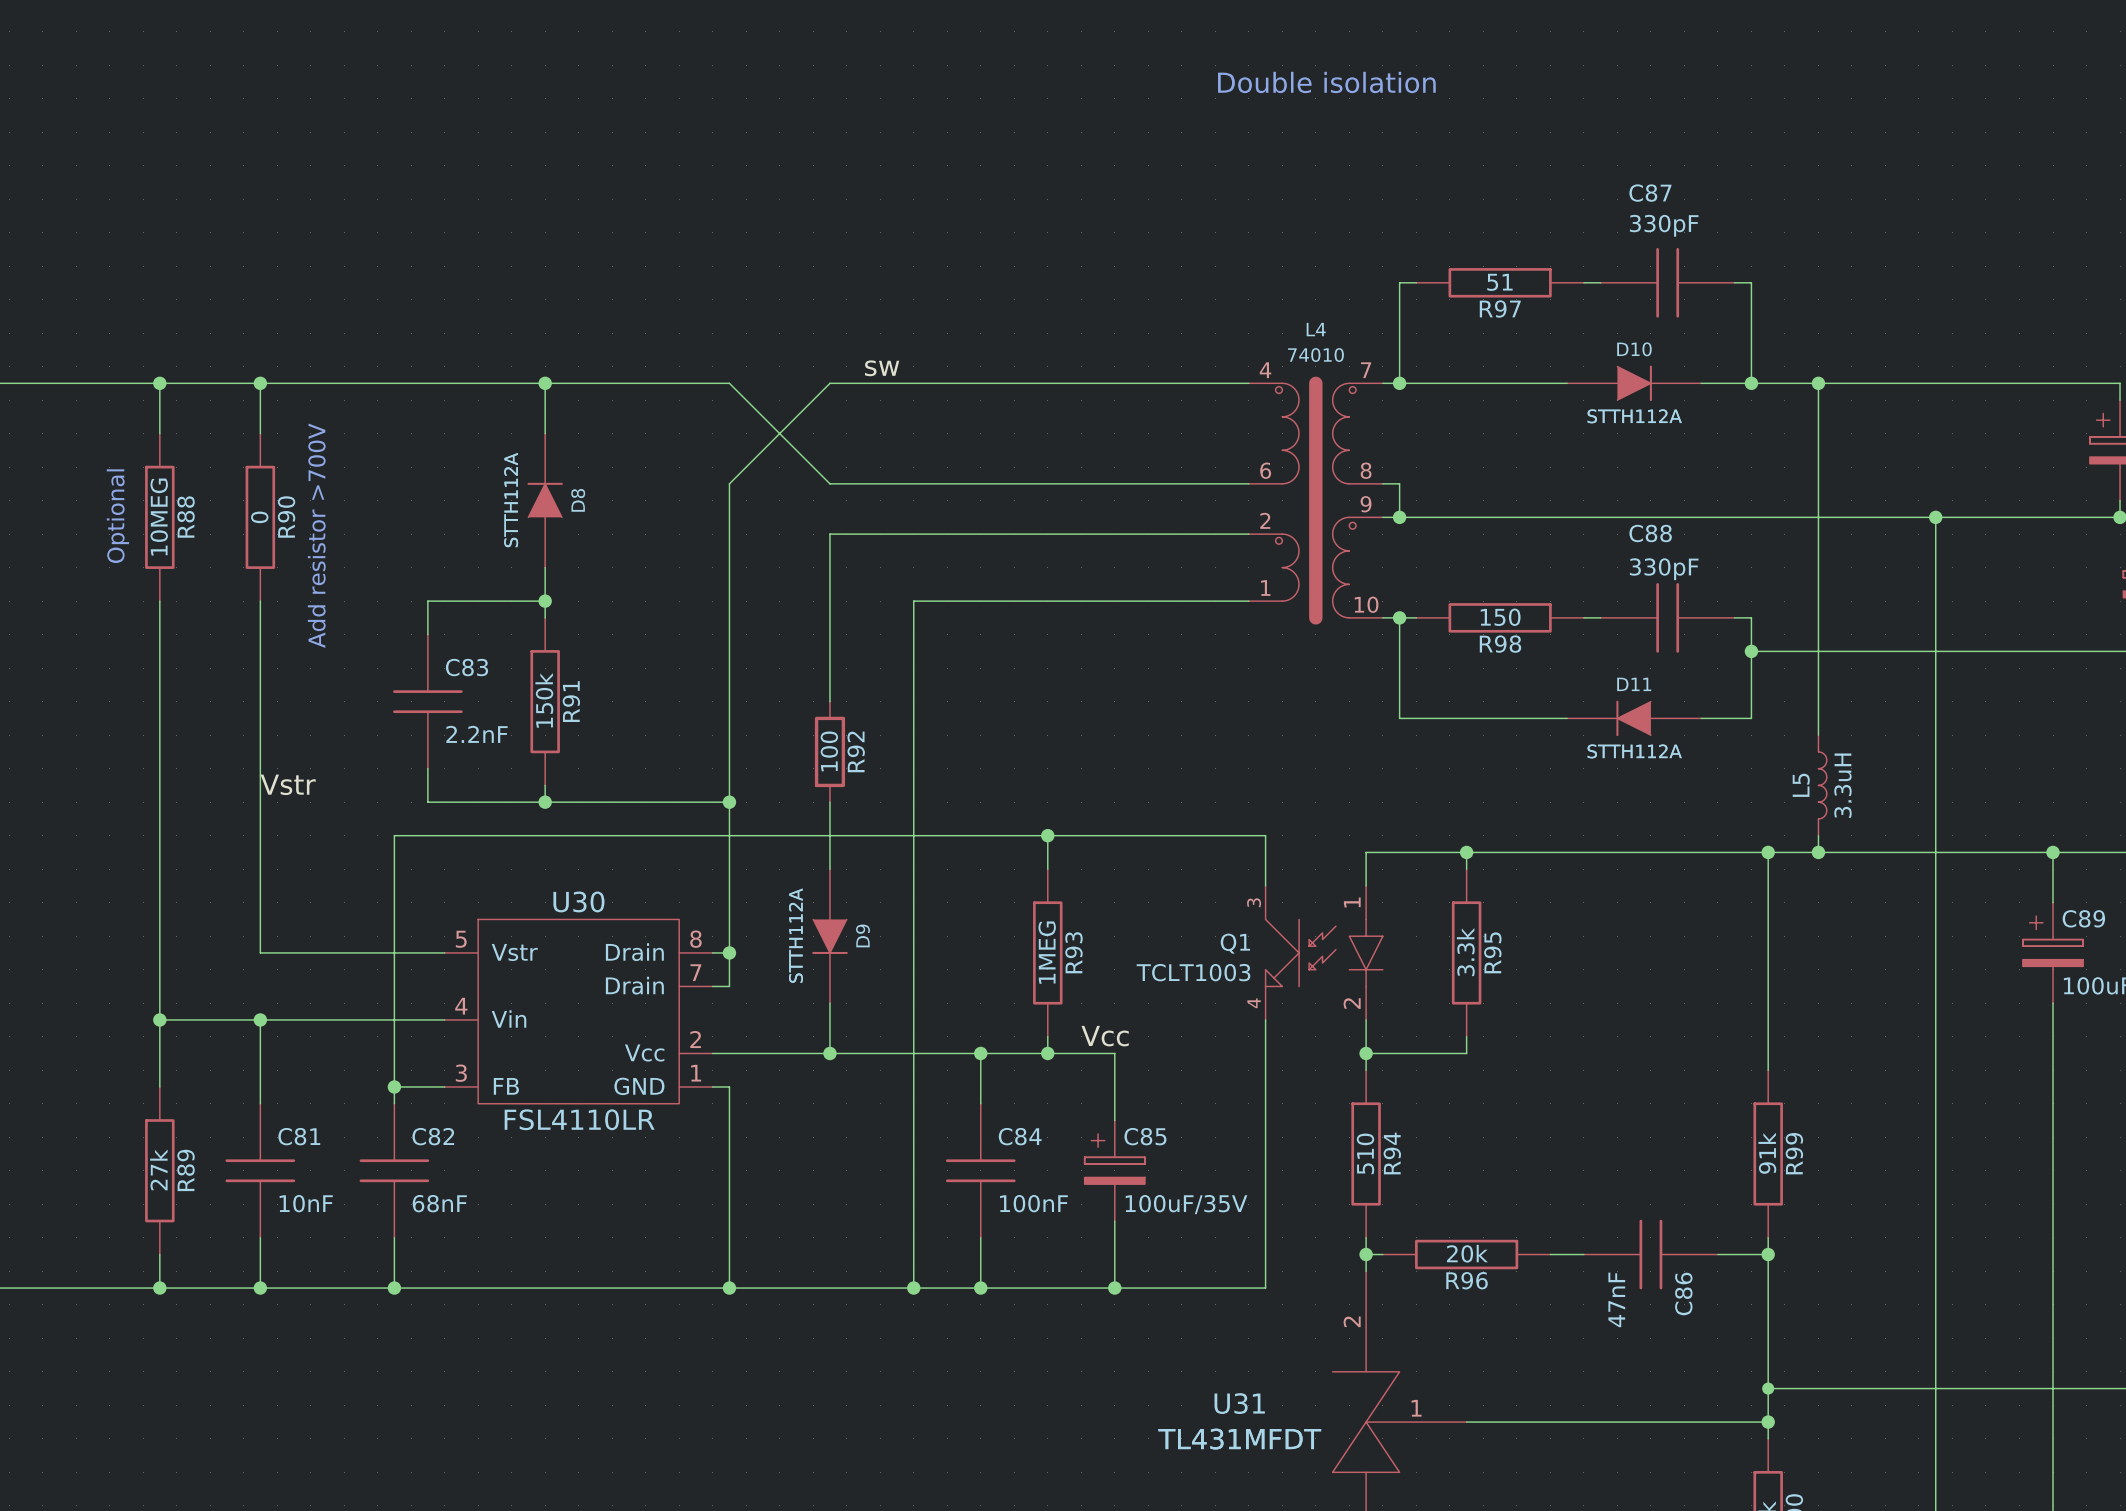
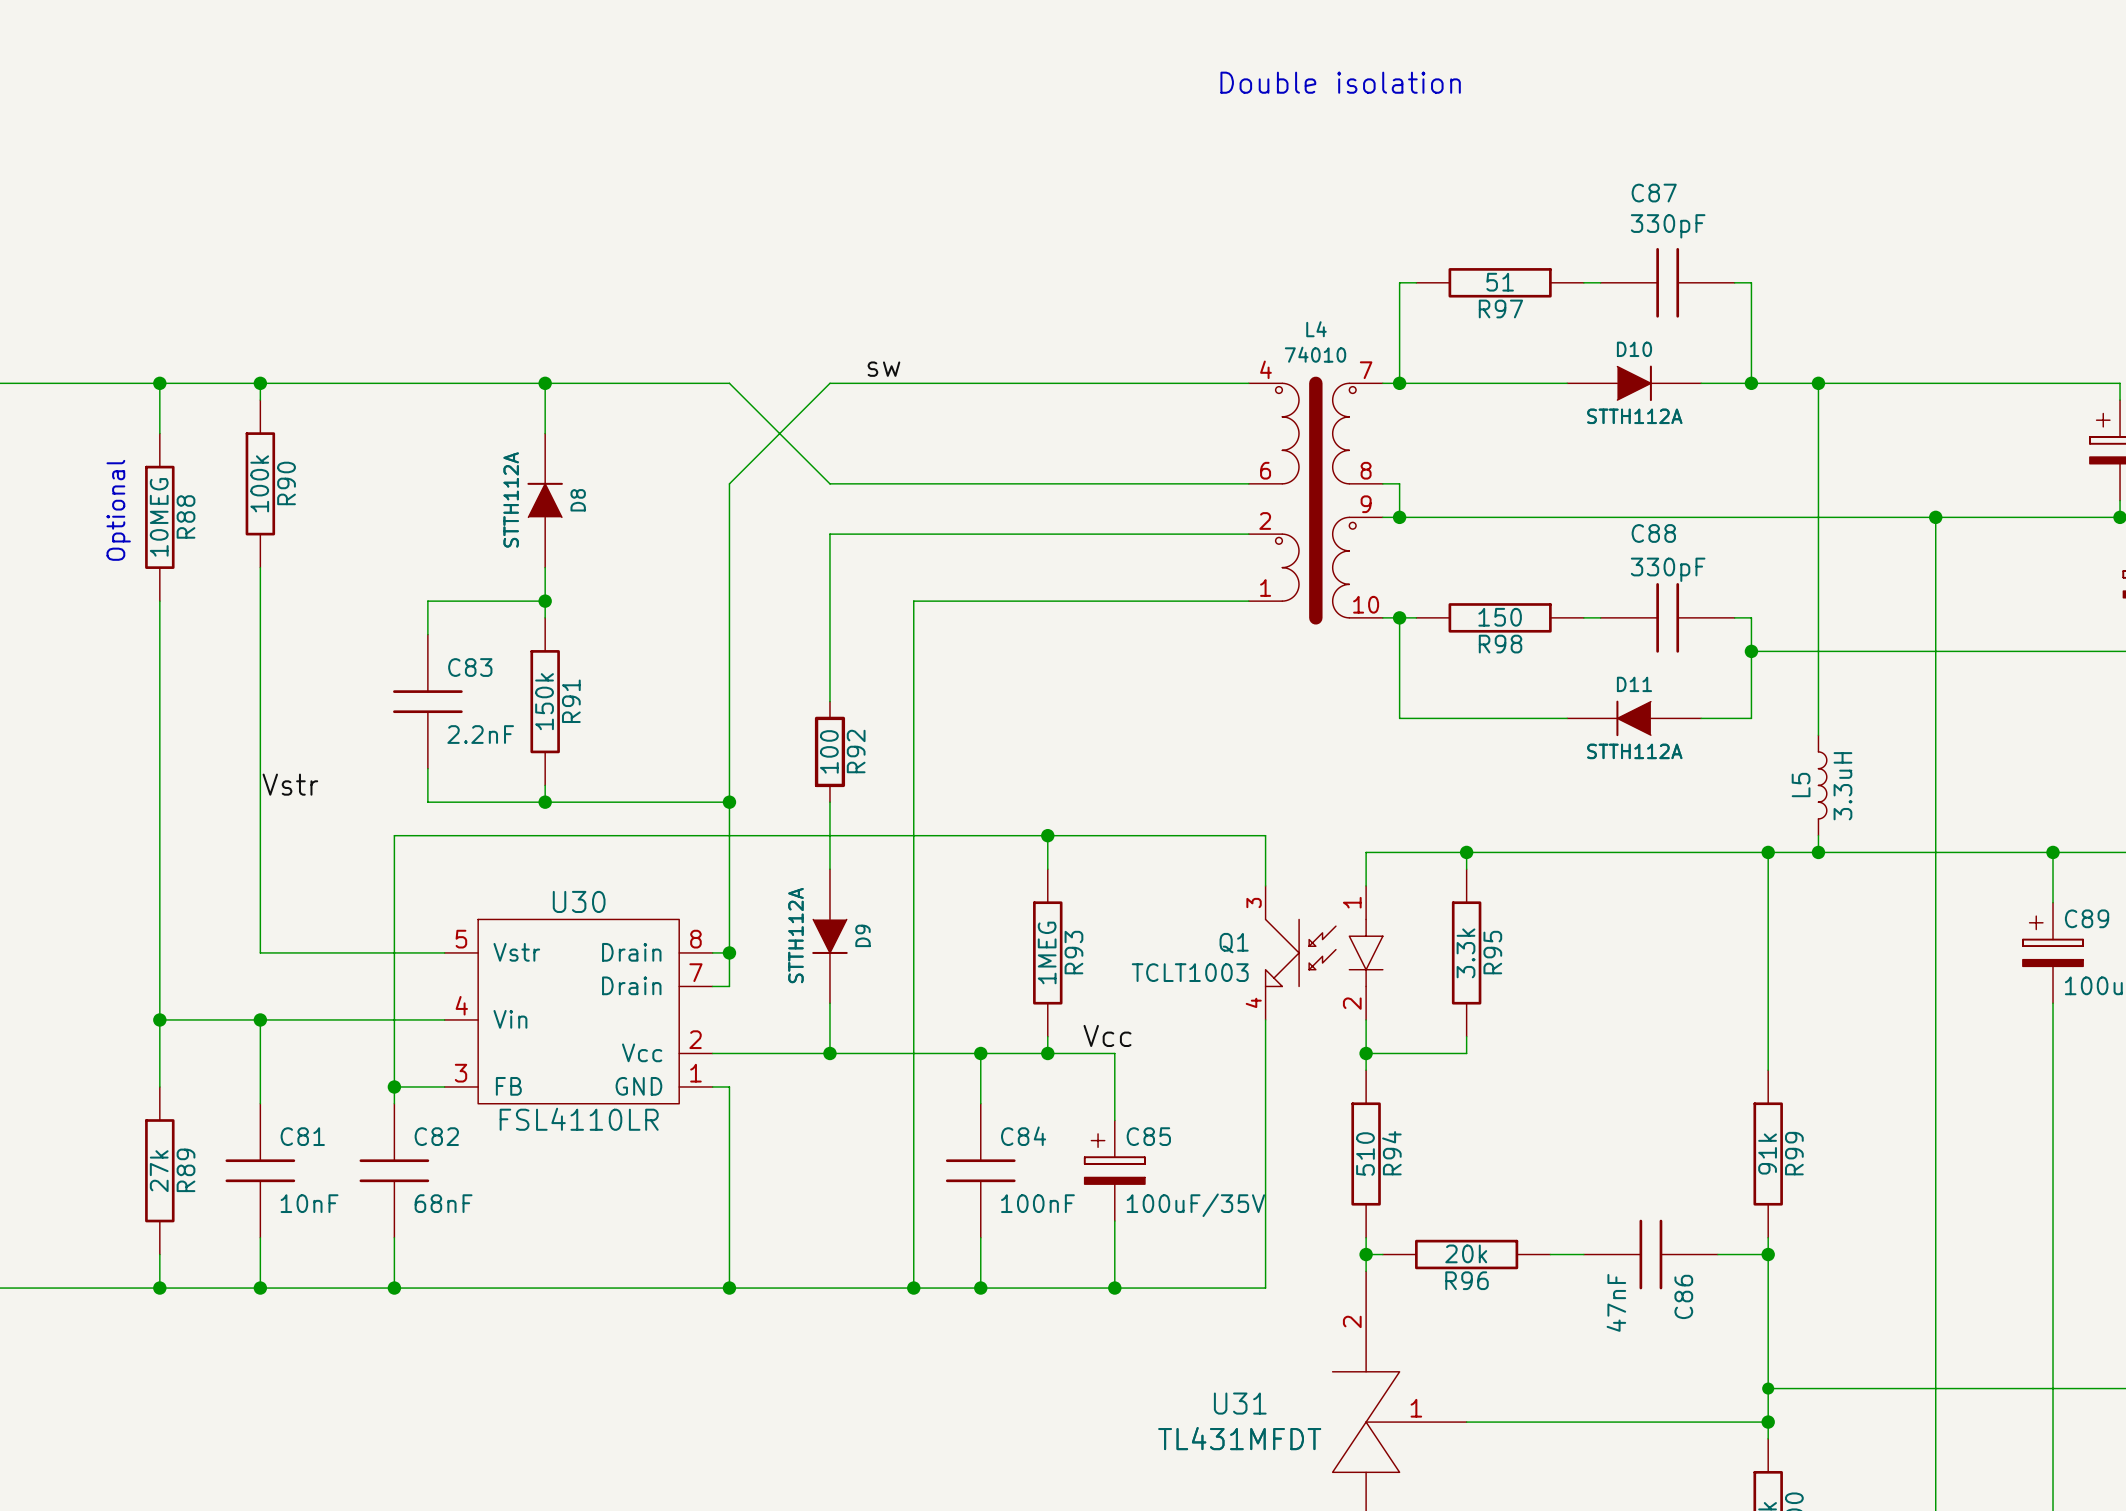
R90 value: 0 (259, 517) -> 100k (259, 483)
R90 position: (260, 517) -> (260, 483)
text: Add resistor >700V (316, 535) -> none

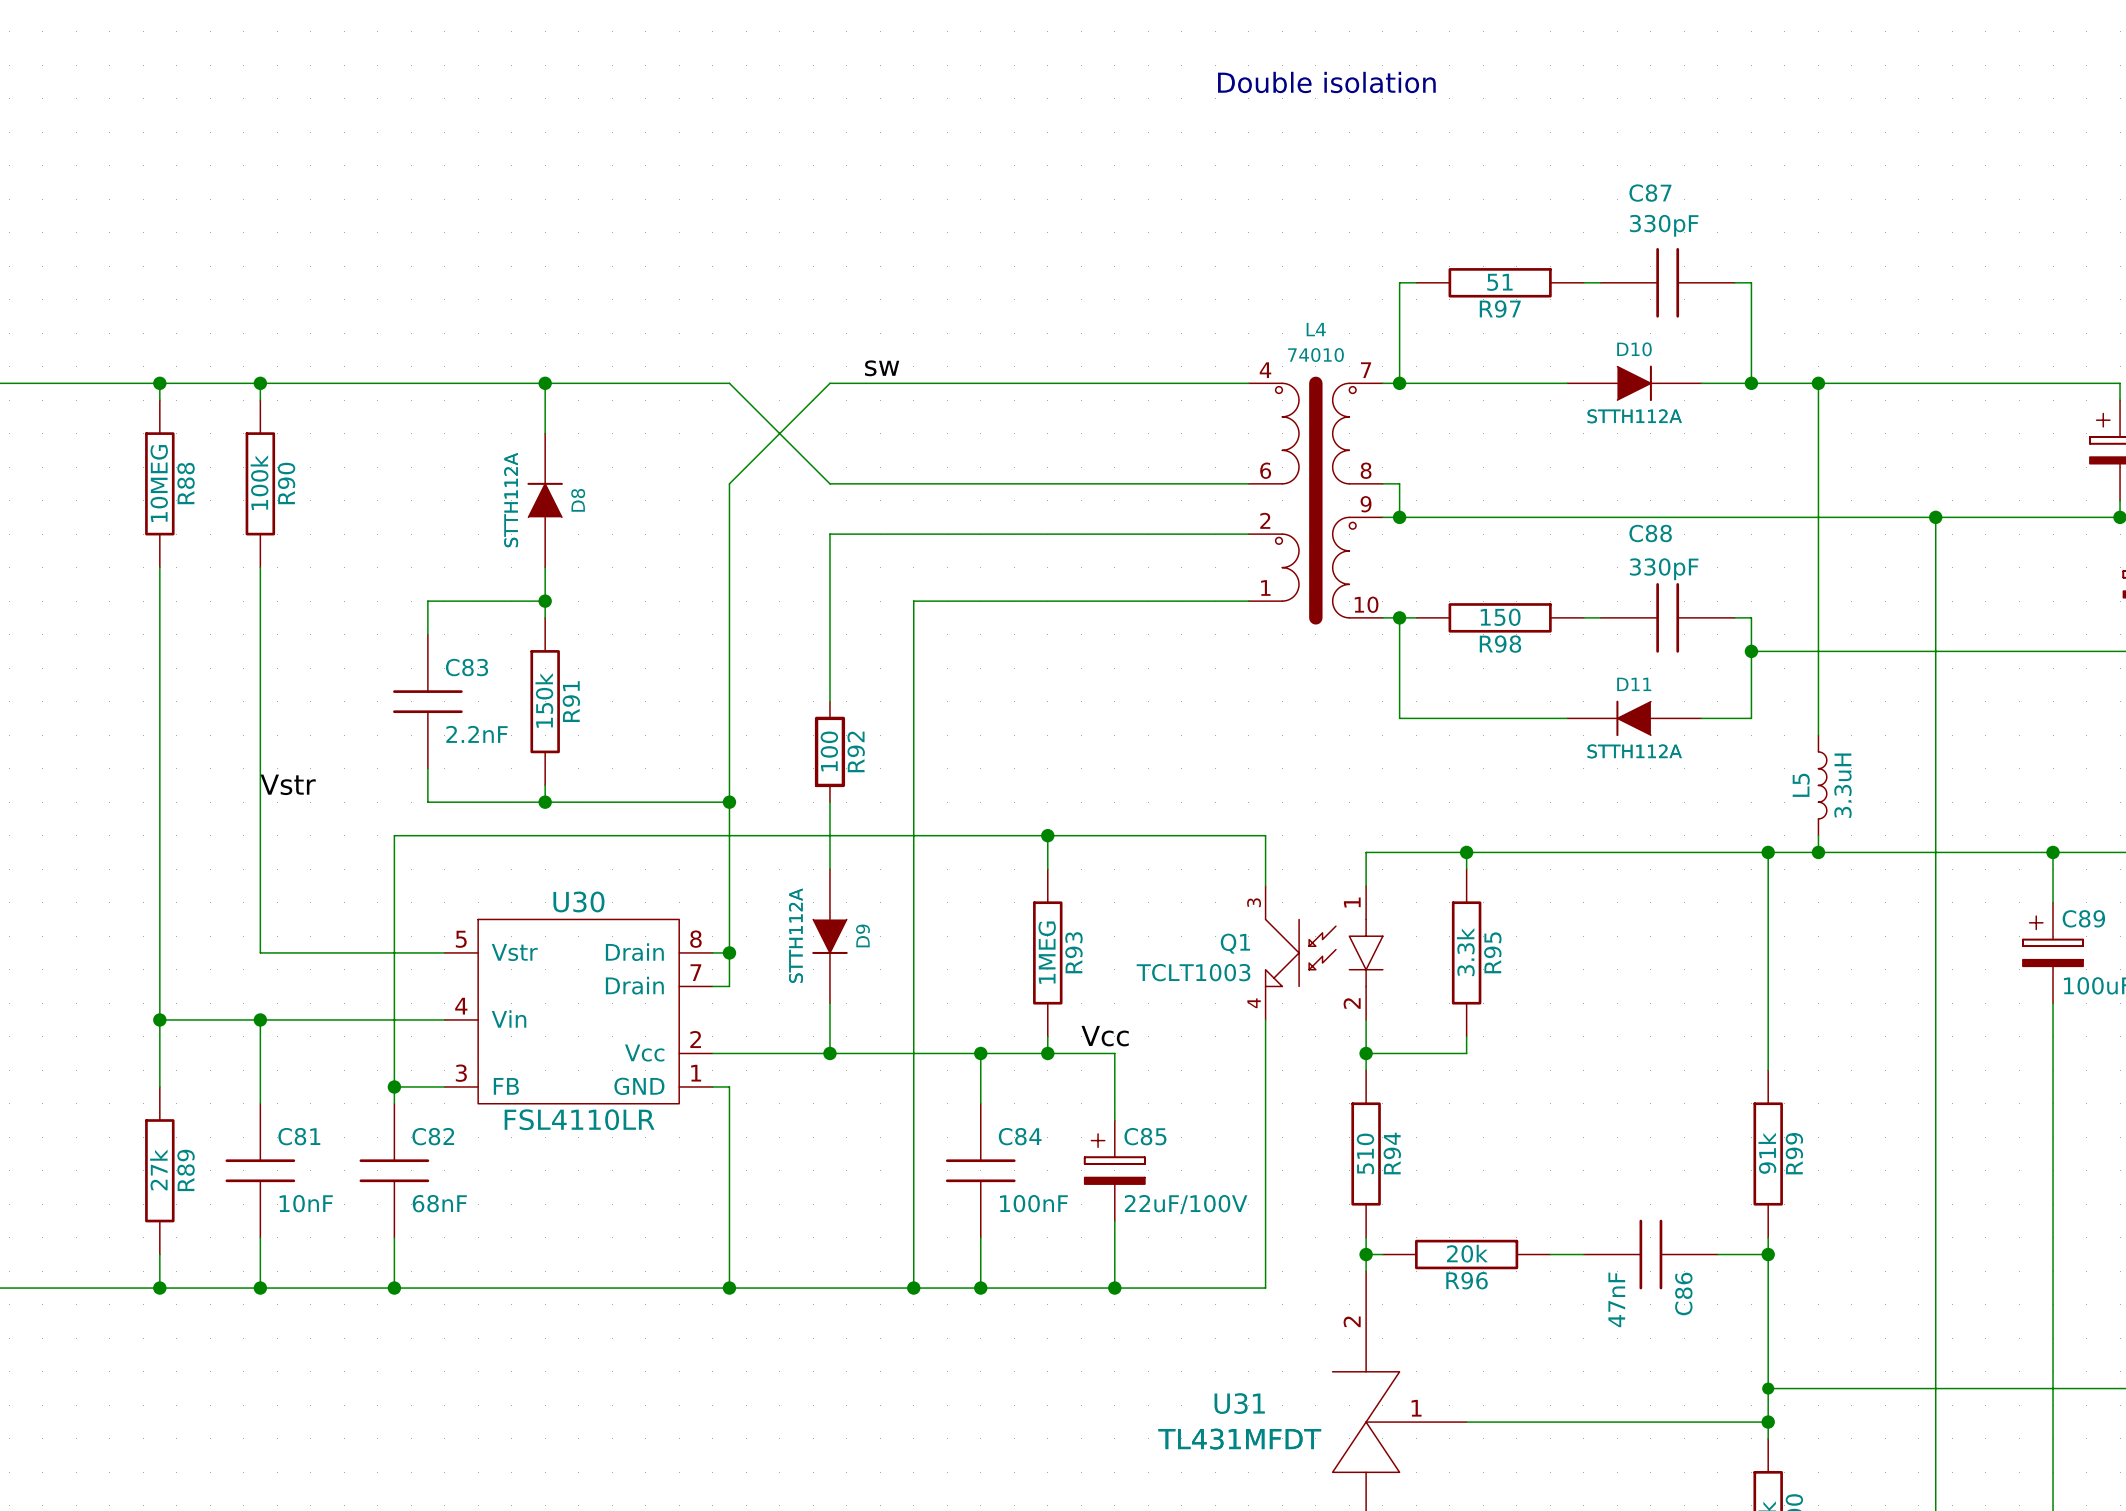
text: Optional (118, 510) -> none
R88 position: (159, 517) -> (159, 483)
C85 value: 100uF/35V (1195, 1205) -> 22uF/100V (1186, 1204)

